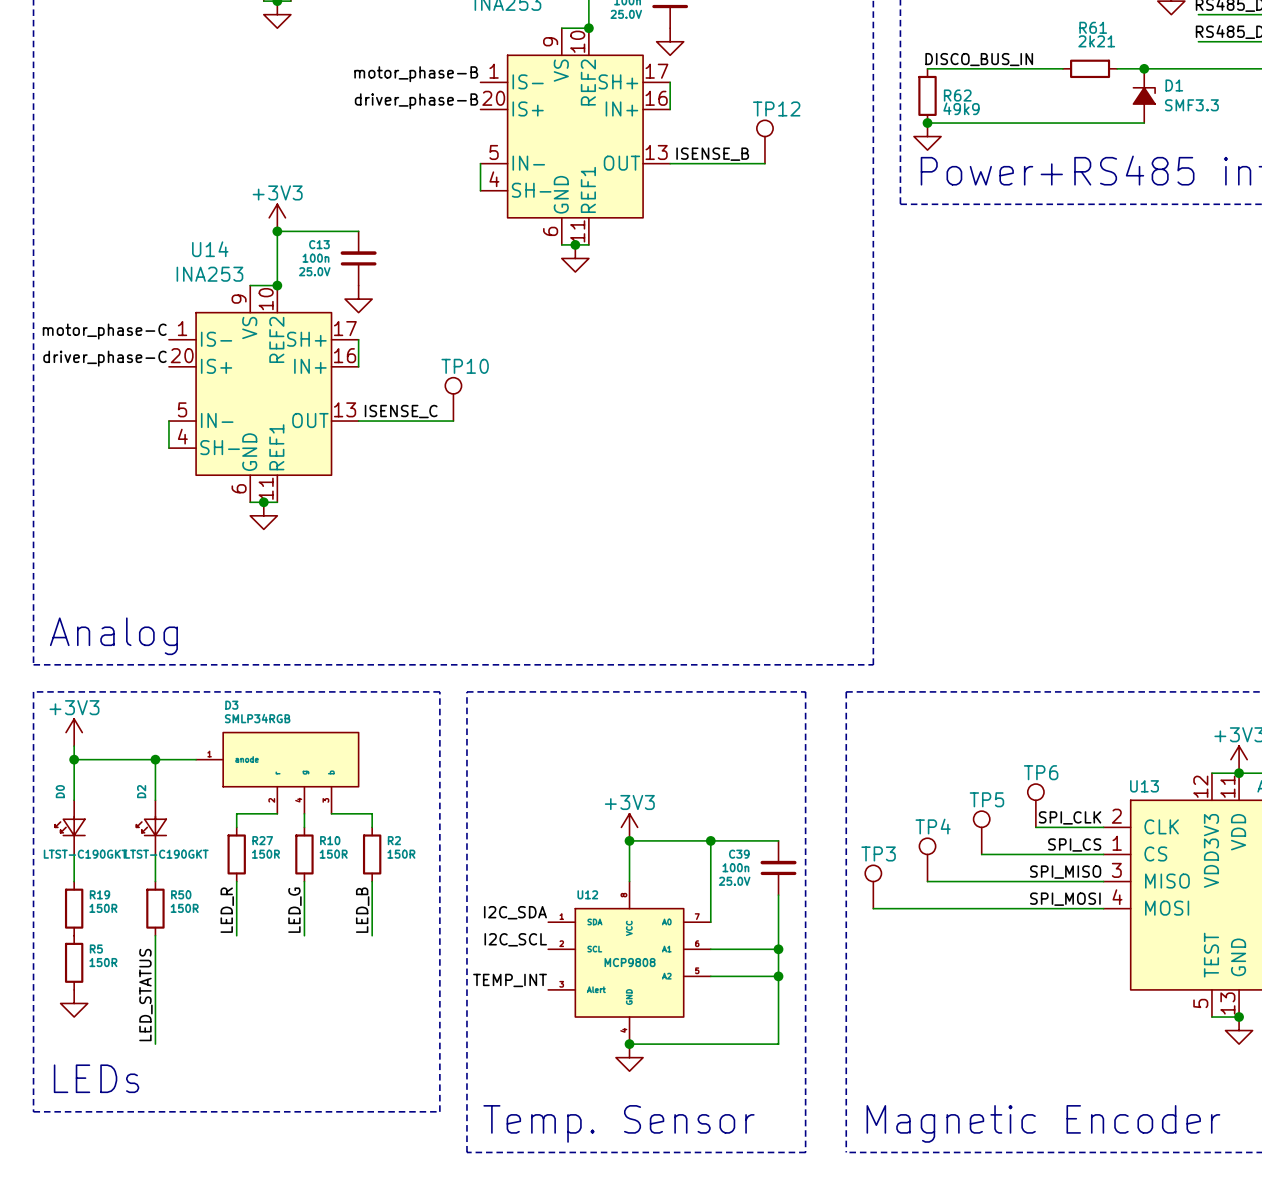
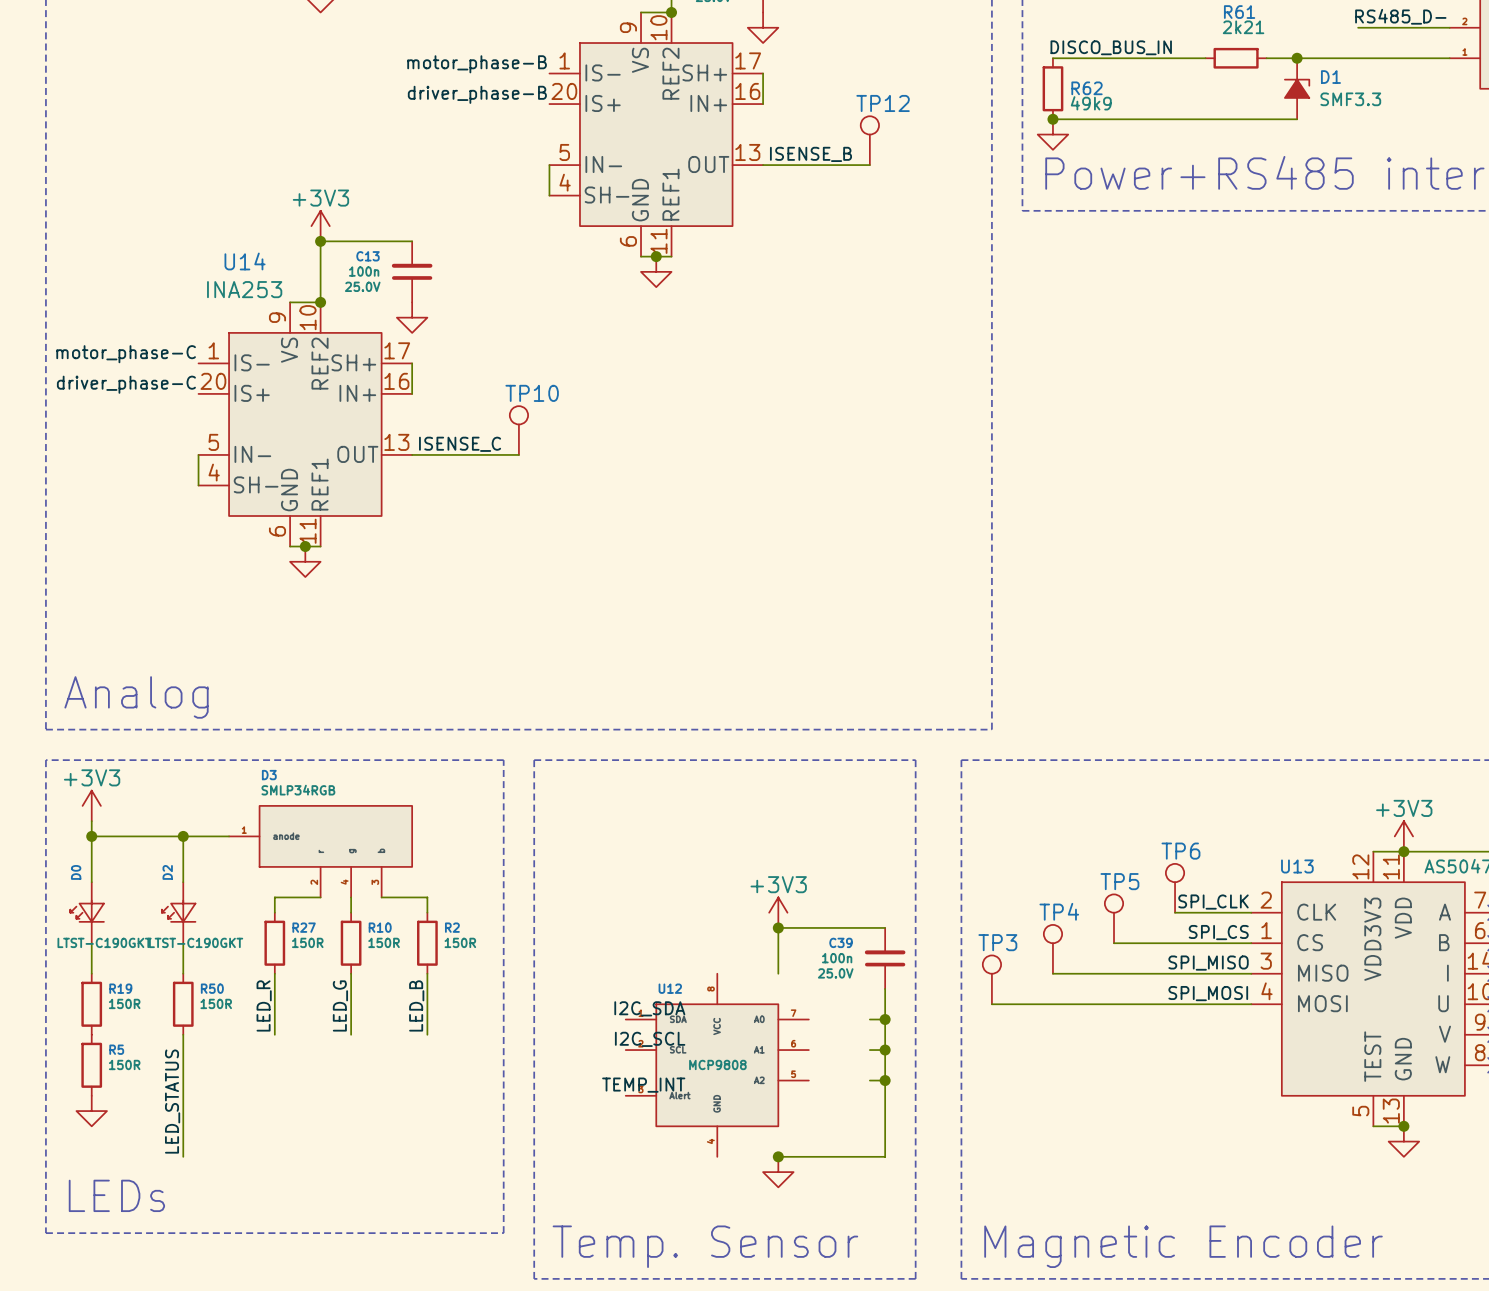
power symbol position: +3V3 (629, 827) -> +3V3 (778, 912)
junction: (629, 840) -> none
wire: (683, 840) (629, 840) (629, 881) -> (778, 927) (778, 973)
junction: none -> (778, 927)
wire: (710, 840) (710, 922) -> none
junction: (710, 840) -> none
label position: I2C_SDA (515, 912) -> I2C_SDA (649, 1008)
wire: none -> (869, 1019) (885, 1019)
junction: none -> (885, 1019)
label position: I2C_SCL (515, 939) -> I2C_SCL (650, 1039)
wire: (710, 949) (764, 949) -> none
wire: (710, 976) (764, 976) -> none
label position: TEMP_INT (510, 980) -> TEMP_INT (643, 1085)
wire: (629, 1044) (683, 1044) -> none
junction position: (629, 1044) -> (778, 1156)
power symbol position: (629, 1057) -> (778, 1172)

